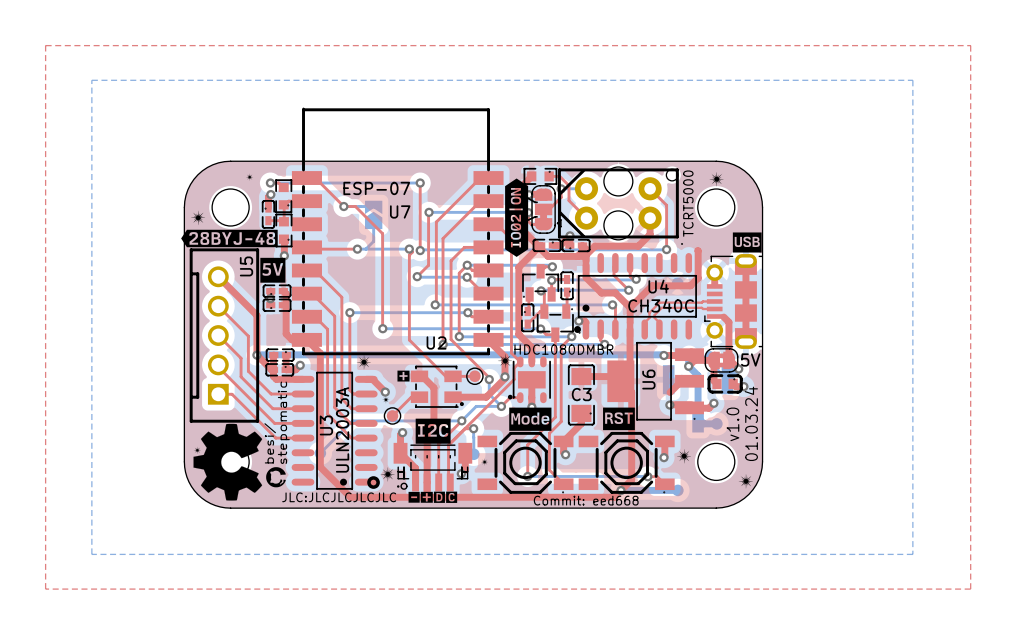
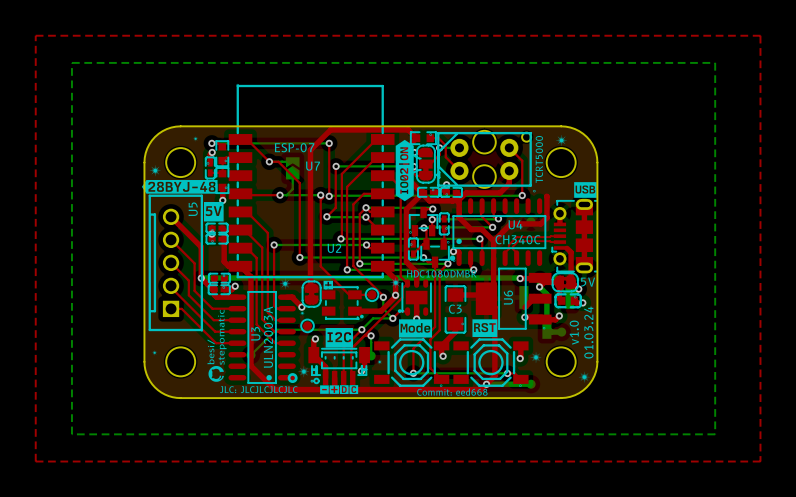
top track: none -> (416, 138) (408, 129) (330, 129) (310, 150) (311, 288)
U2 name position: U2 (436, 342) -> U2 (334, 248)
part: none -> (311, 294)
drawing position: (403, 376) -> (328, 285)
top track: (419, 376) (422, 376) (433, 387) (433, 420) (427, 427) (427, 482) -> none
top track: (419, 397) (411, 397) (392, 415) -> none
drawing: [193, 423, 263, 501] -> none

